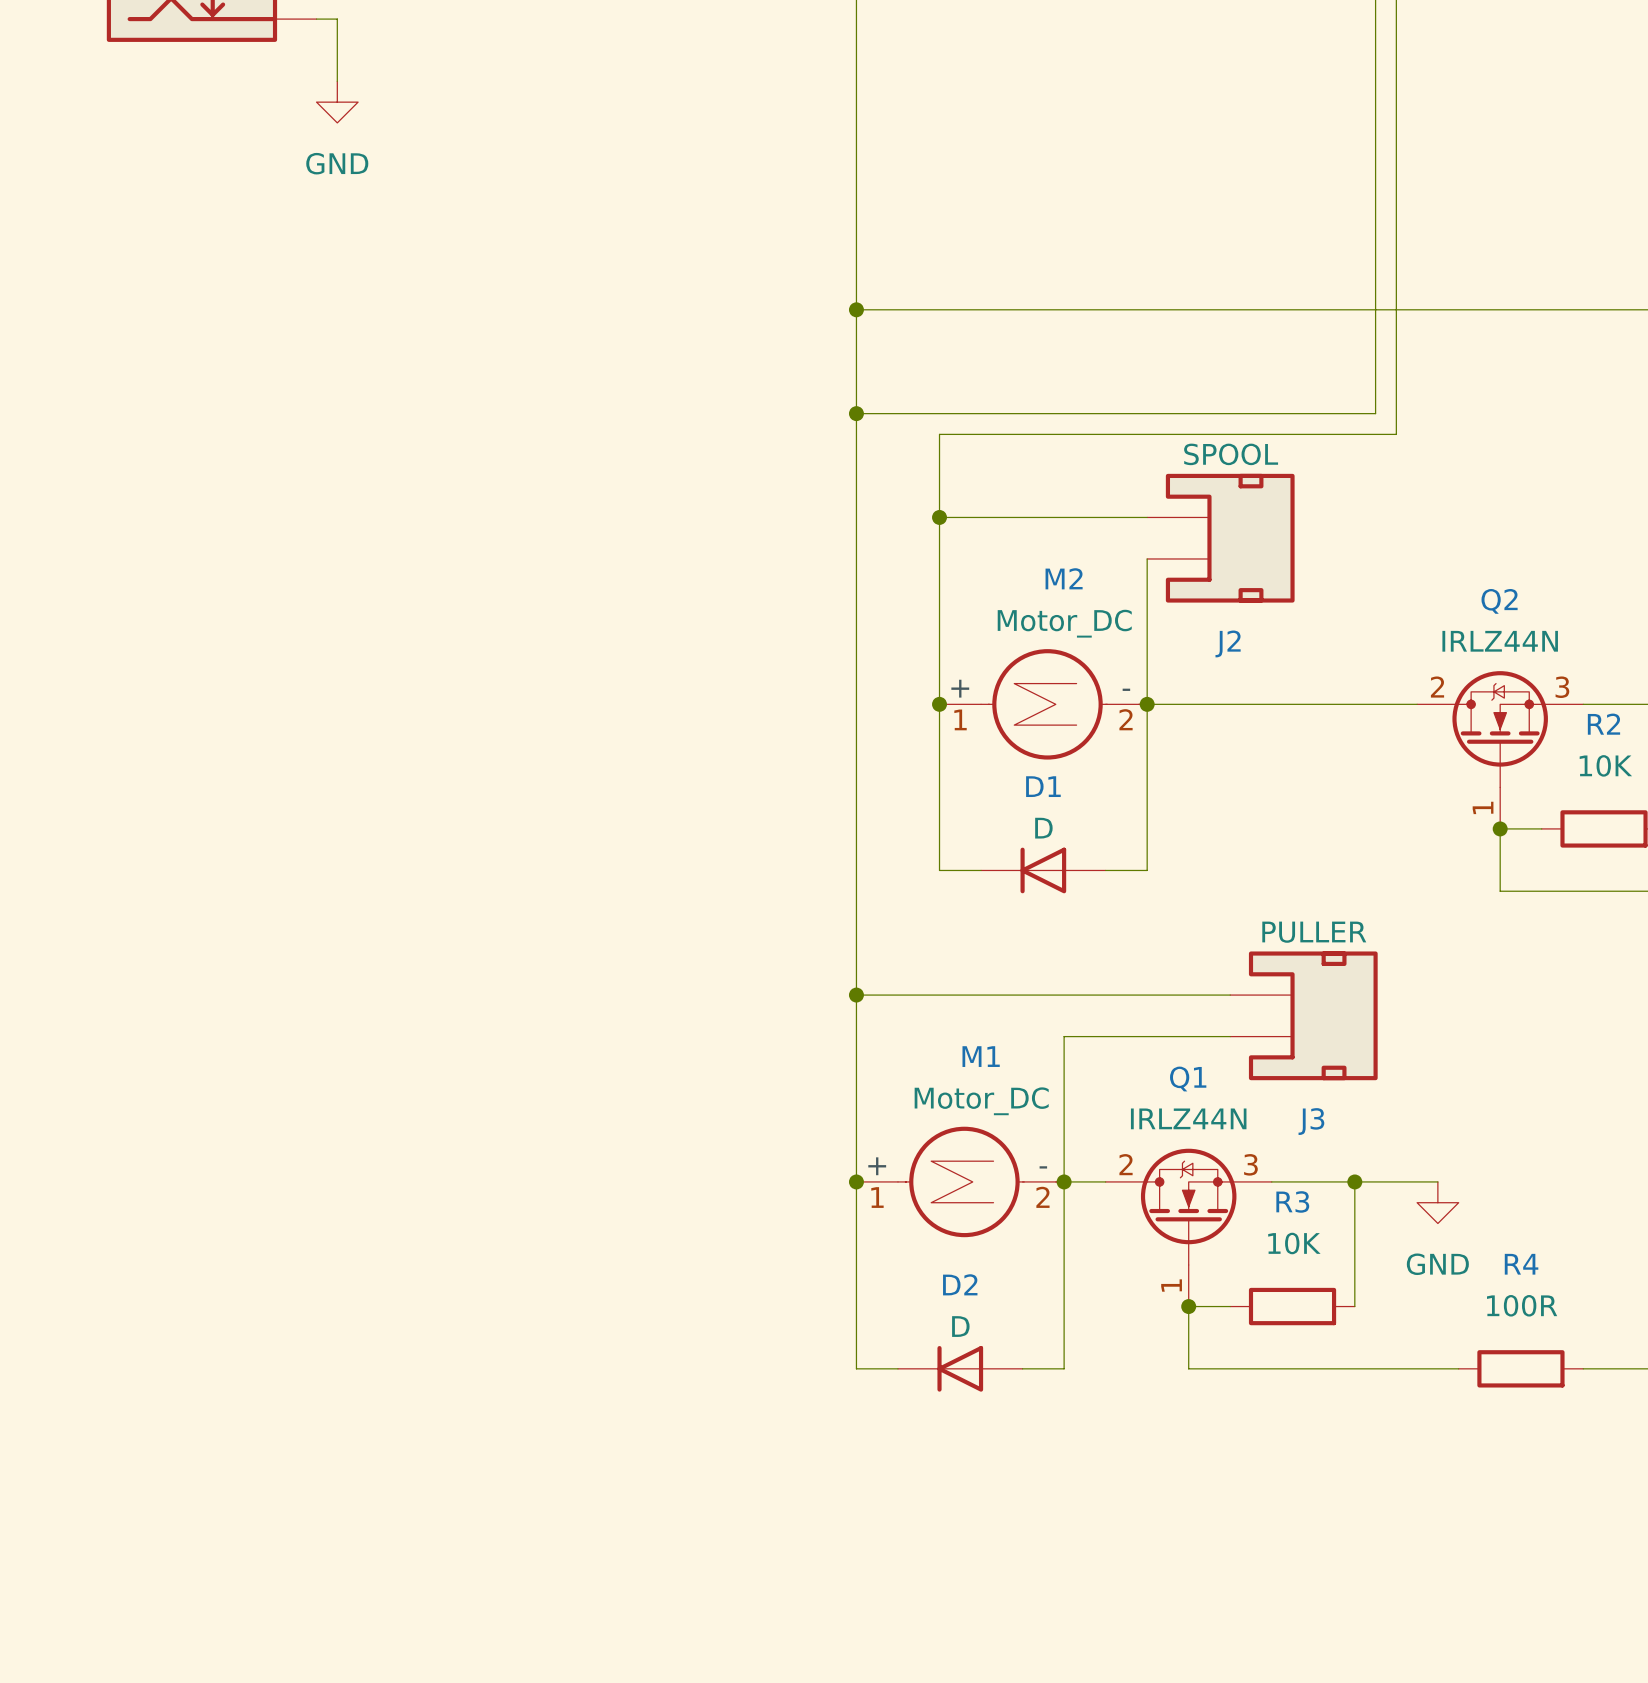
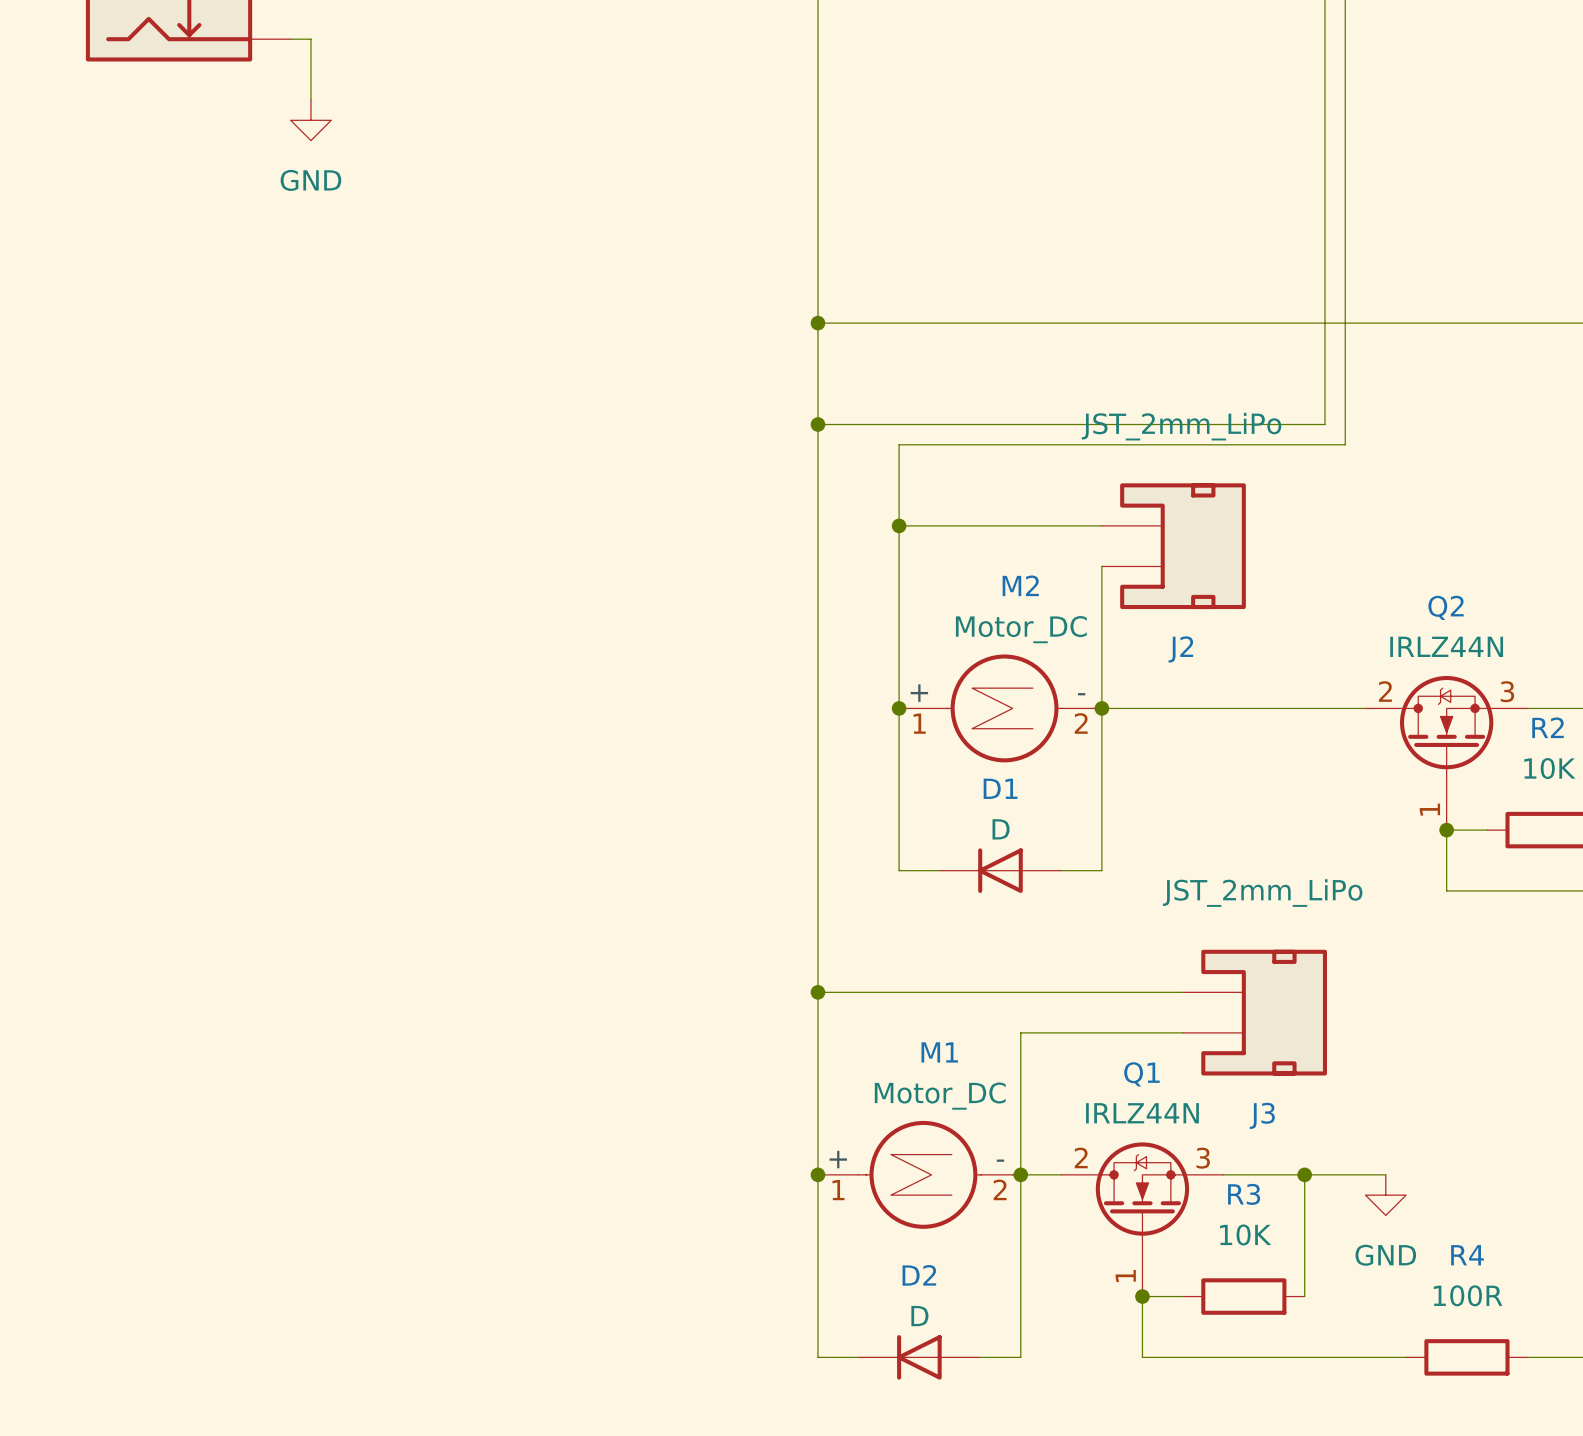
J2 value: SPOOL (1231, 454) -> JST_2mm_LiPo (1181, 426)
J3 value: PULLER (1314, 932) -> JST_2mm_LiPo (1262, 893)

